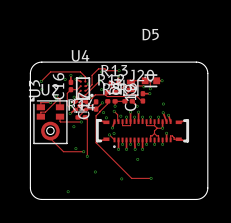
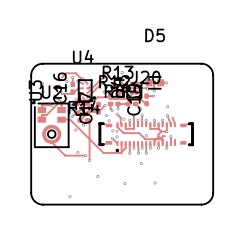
track: (119, 70) (98, 68) (92, 75) (92, 84) (85, 90) -> (102, 78) (87, 93)
track: (41, 81) (50, 71) (80, 71) (85, 76) (85, 81) -> (61, 77) (66, 73) (75, 73) (87, 83)
track: (80, 86) (77, 89) (70, 89) (67, 93) (67, 105) (70, 106) -> (82, 88) (78, 88) (72, 93) (62, 93) (60, 92)
track: (107, 103) (96, 115) (96, 142) (131, 178) (151, 178) -> (110, 106) (112, 110)
via: none -> (112, 110)
track: (60, 116) (60, 121) (81, 121) -> (61, 119) (70, 119) (103, 152) (120, 152) (125, 148)
track: (114, 121) (112, 127) -> (117, 124) (123, 133) (139, 133) (145, 139) (159, 139) (165, 136)
via: none -> (112, 130)
via: (112, 127) -> none
via: none -> (116, 131)
via: none -> (146, 135)
track: (170, 135) (174, 139) (185, 140) -> none
via: (122, 144) -> none
via: (118, 149) -> none

